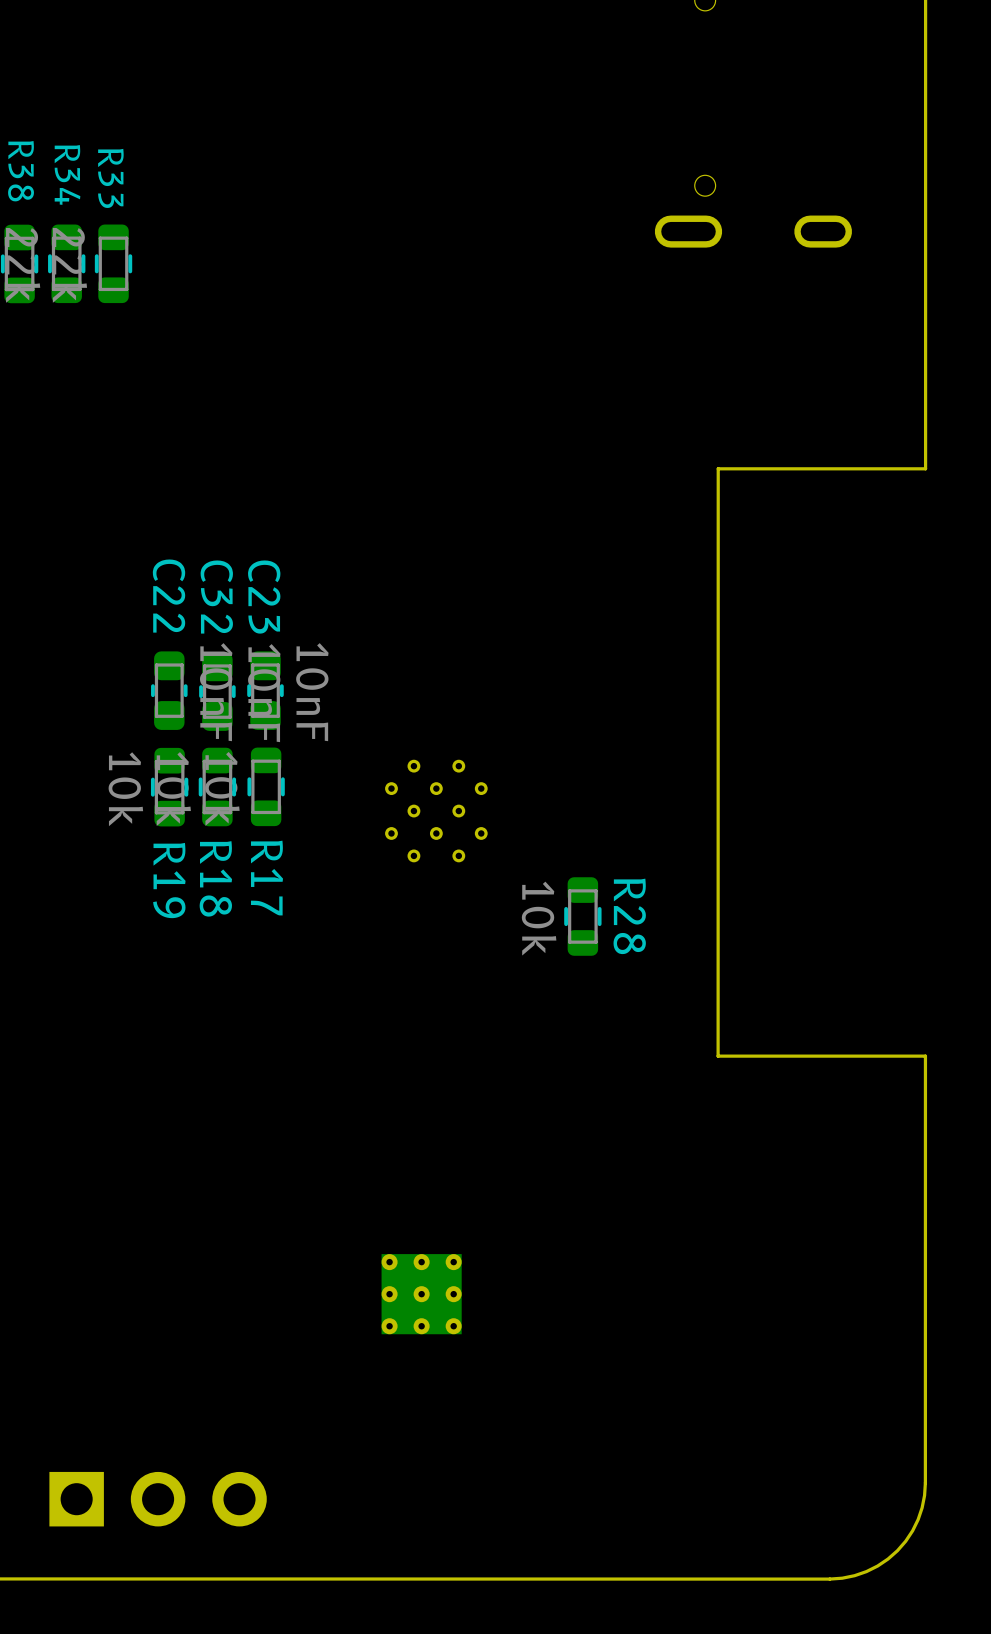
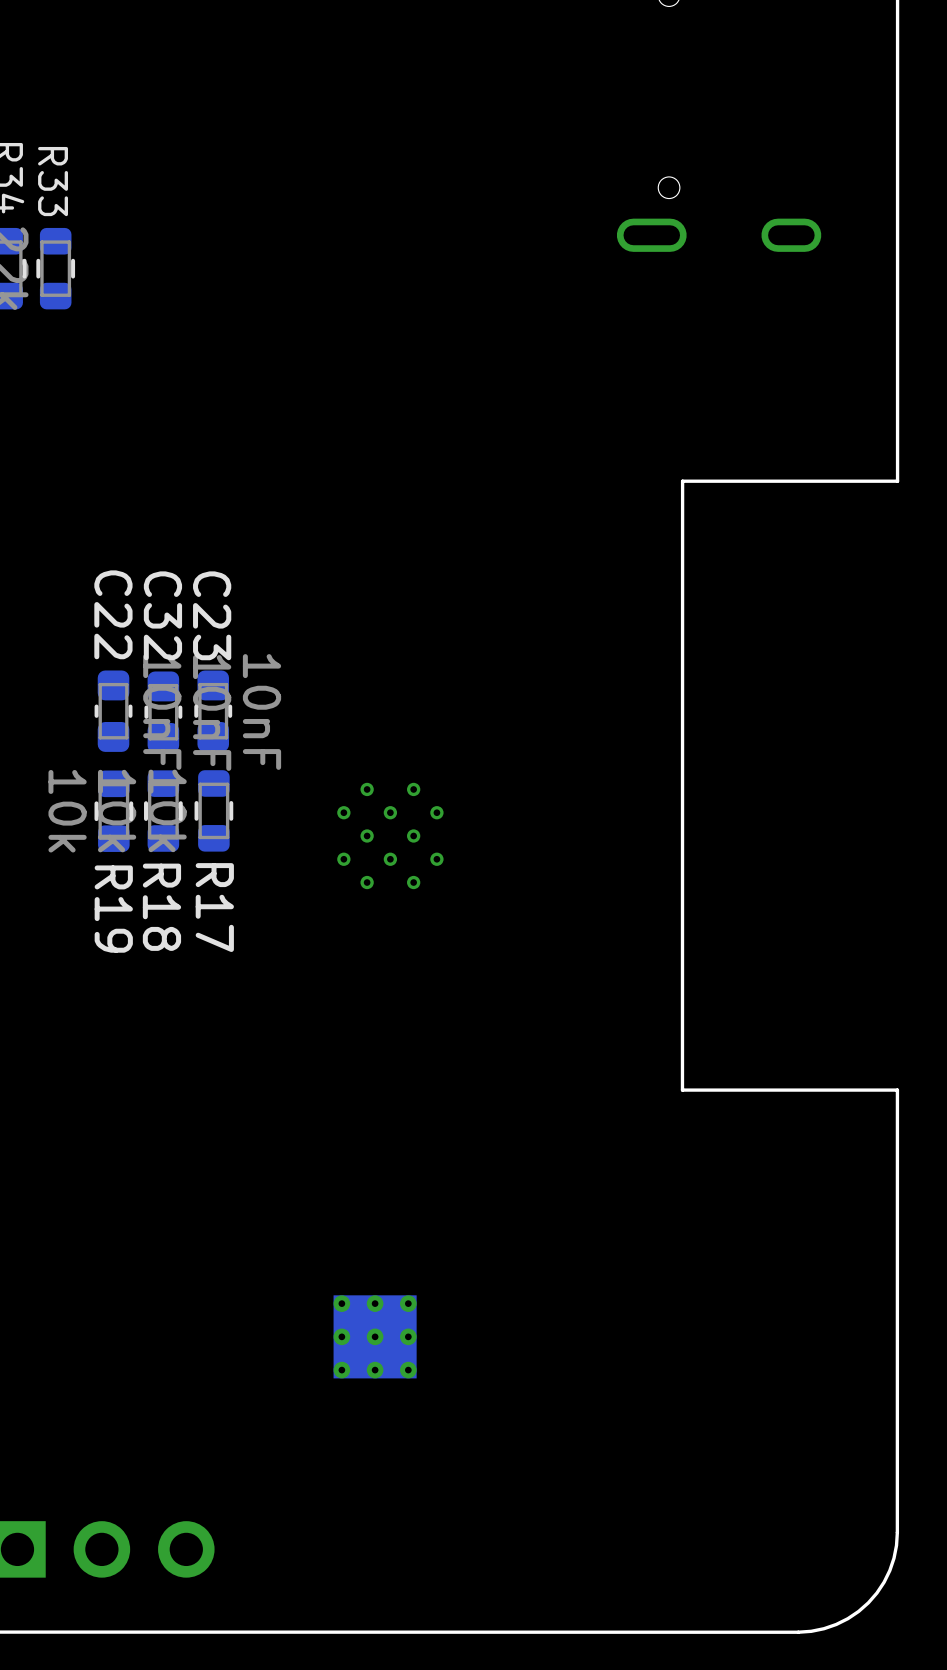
R28: 10k (582, 916) -> none

